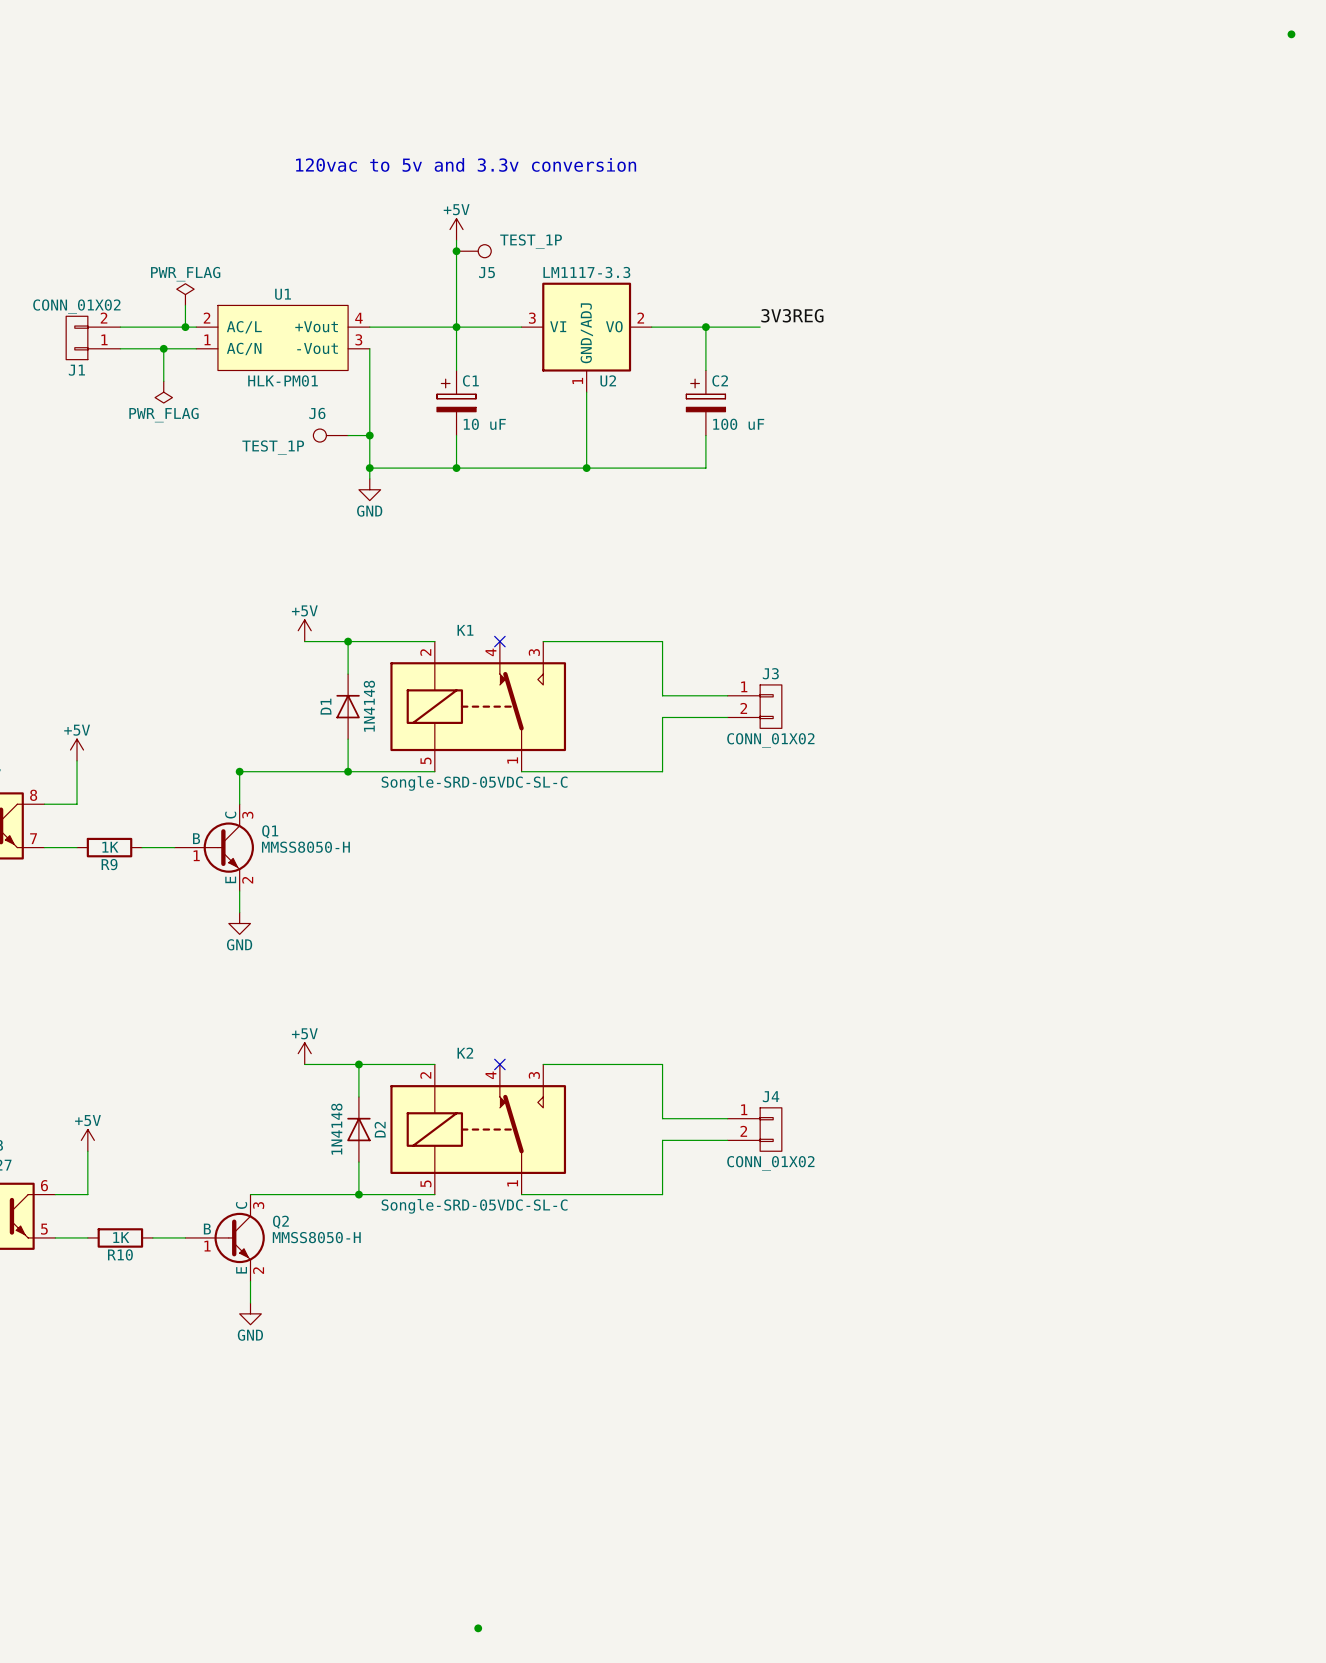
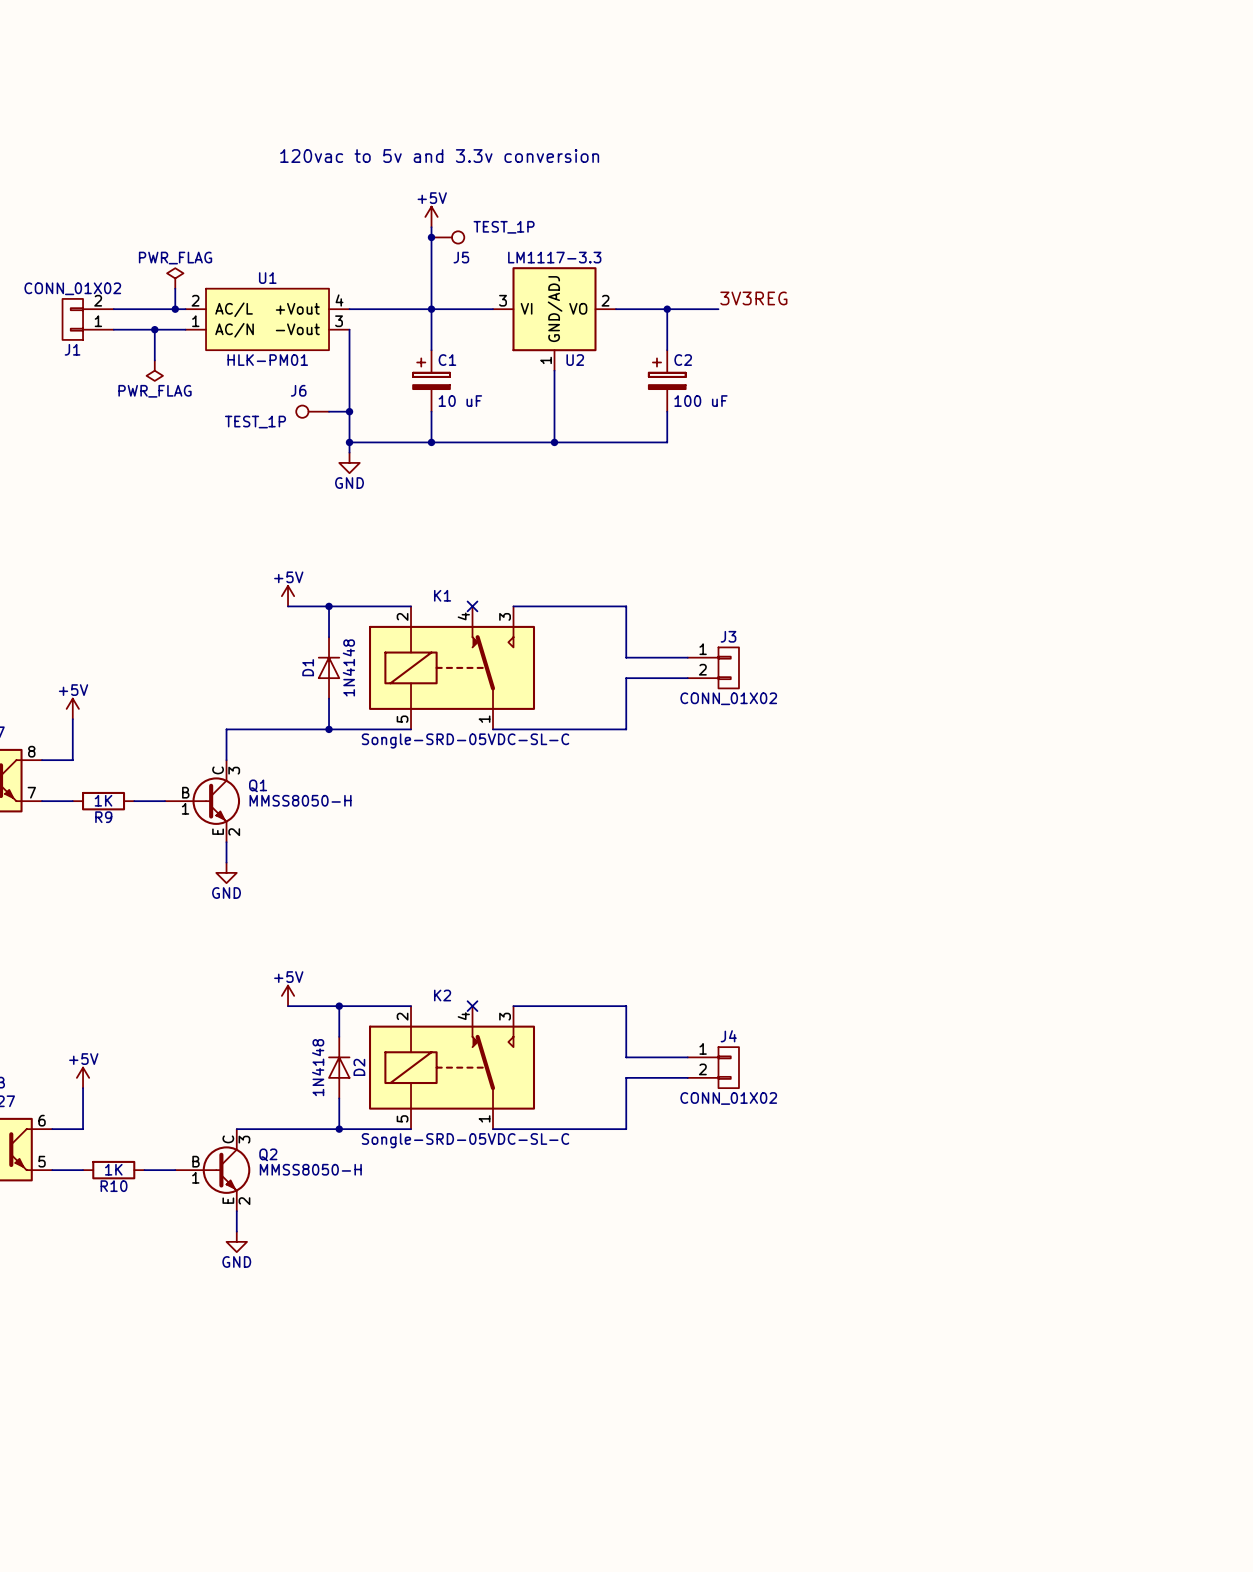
junction: (1291, 34) -> none
junction: (239, 771) -> none
junction: (478, 1628) -> none

